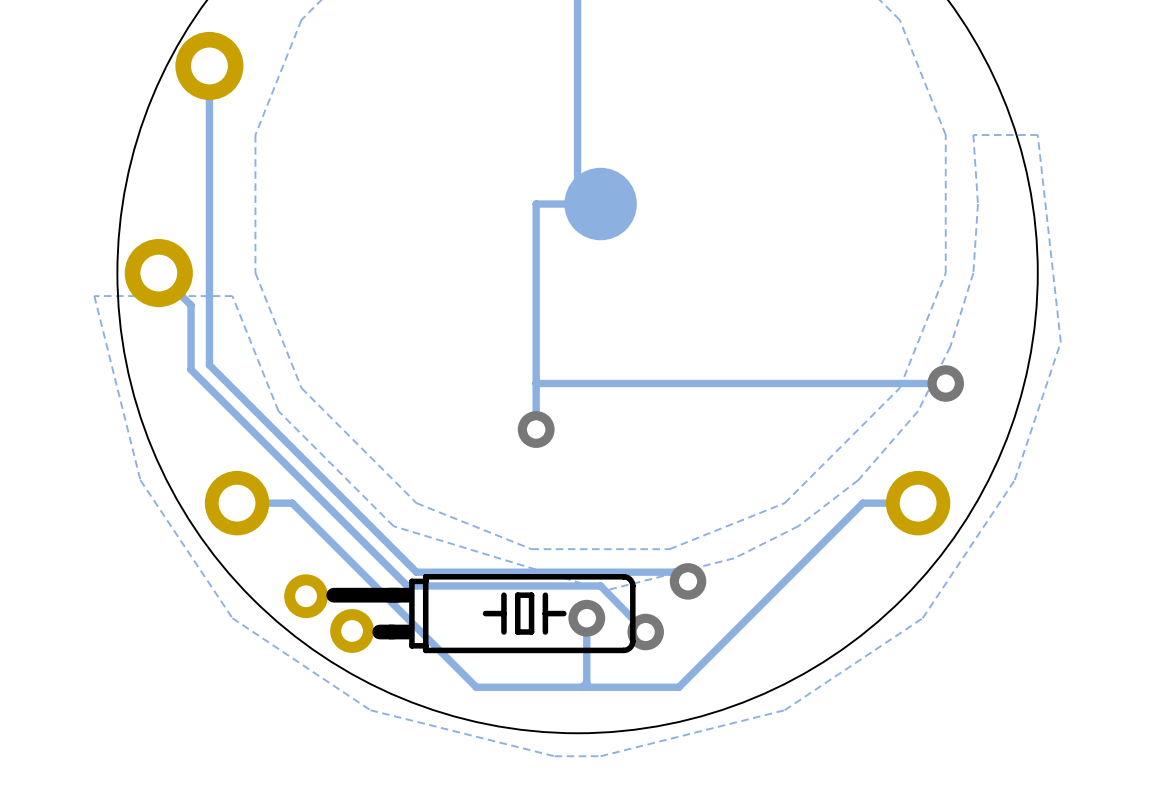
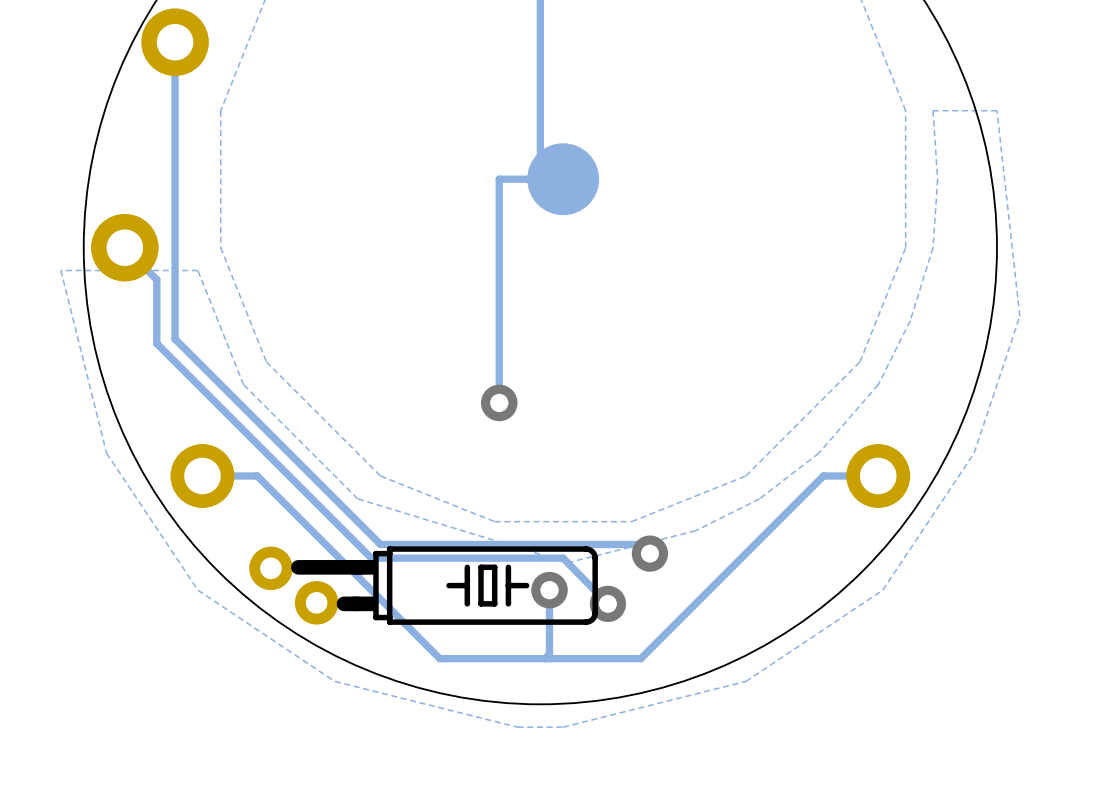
track: (945, 383) (536, 383) -> none
via: (945, 383) -> none

